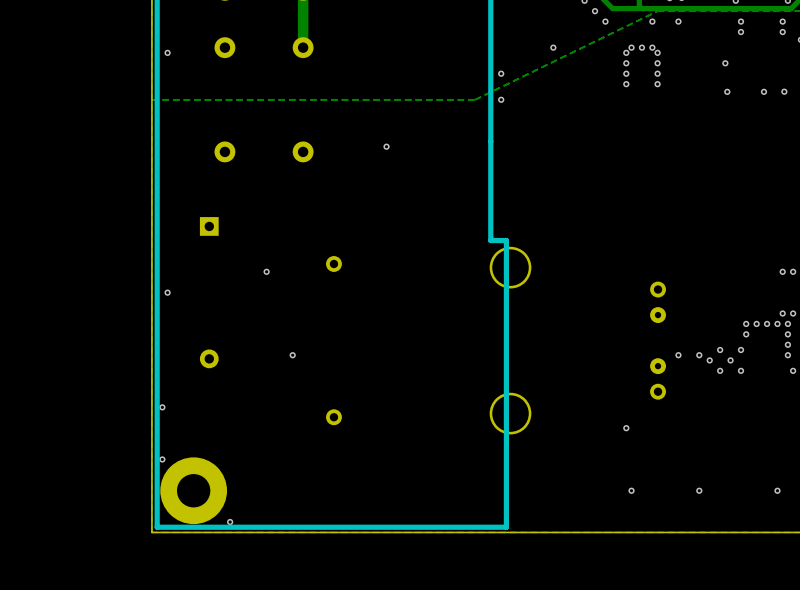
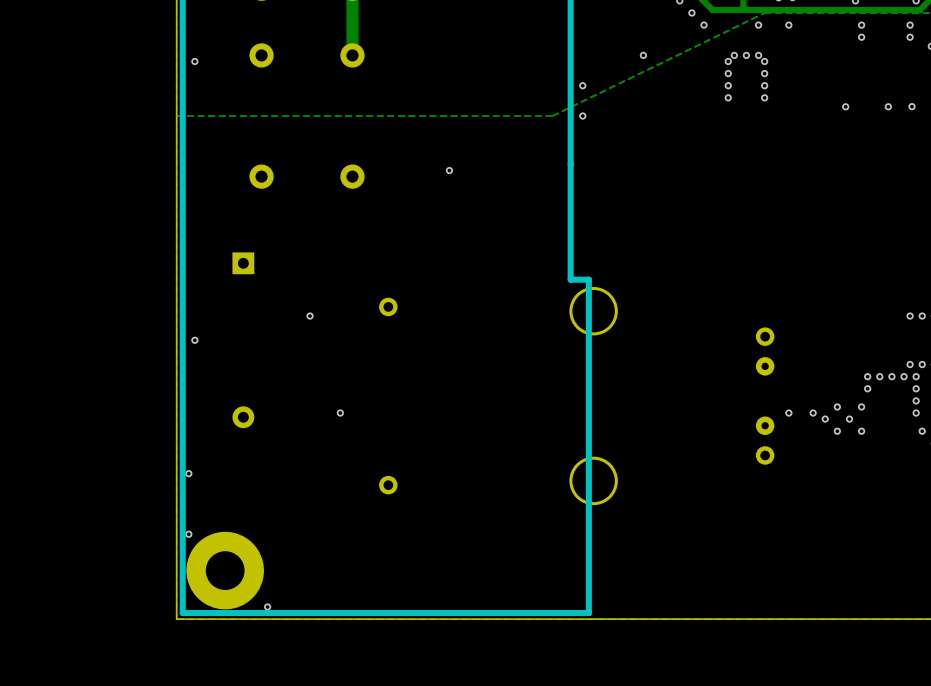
via: (725, 63) -> none
via: (626, 428) -> none
via: (631, 490) -> none
via: (699, 490) -> none
via: (777, 490) -> none

